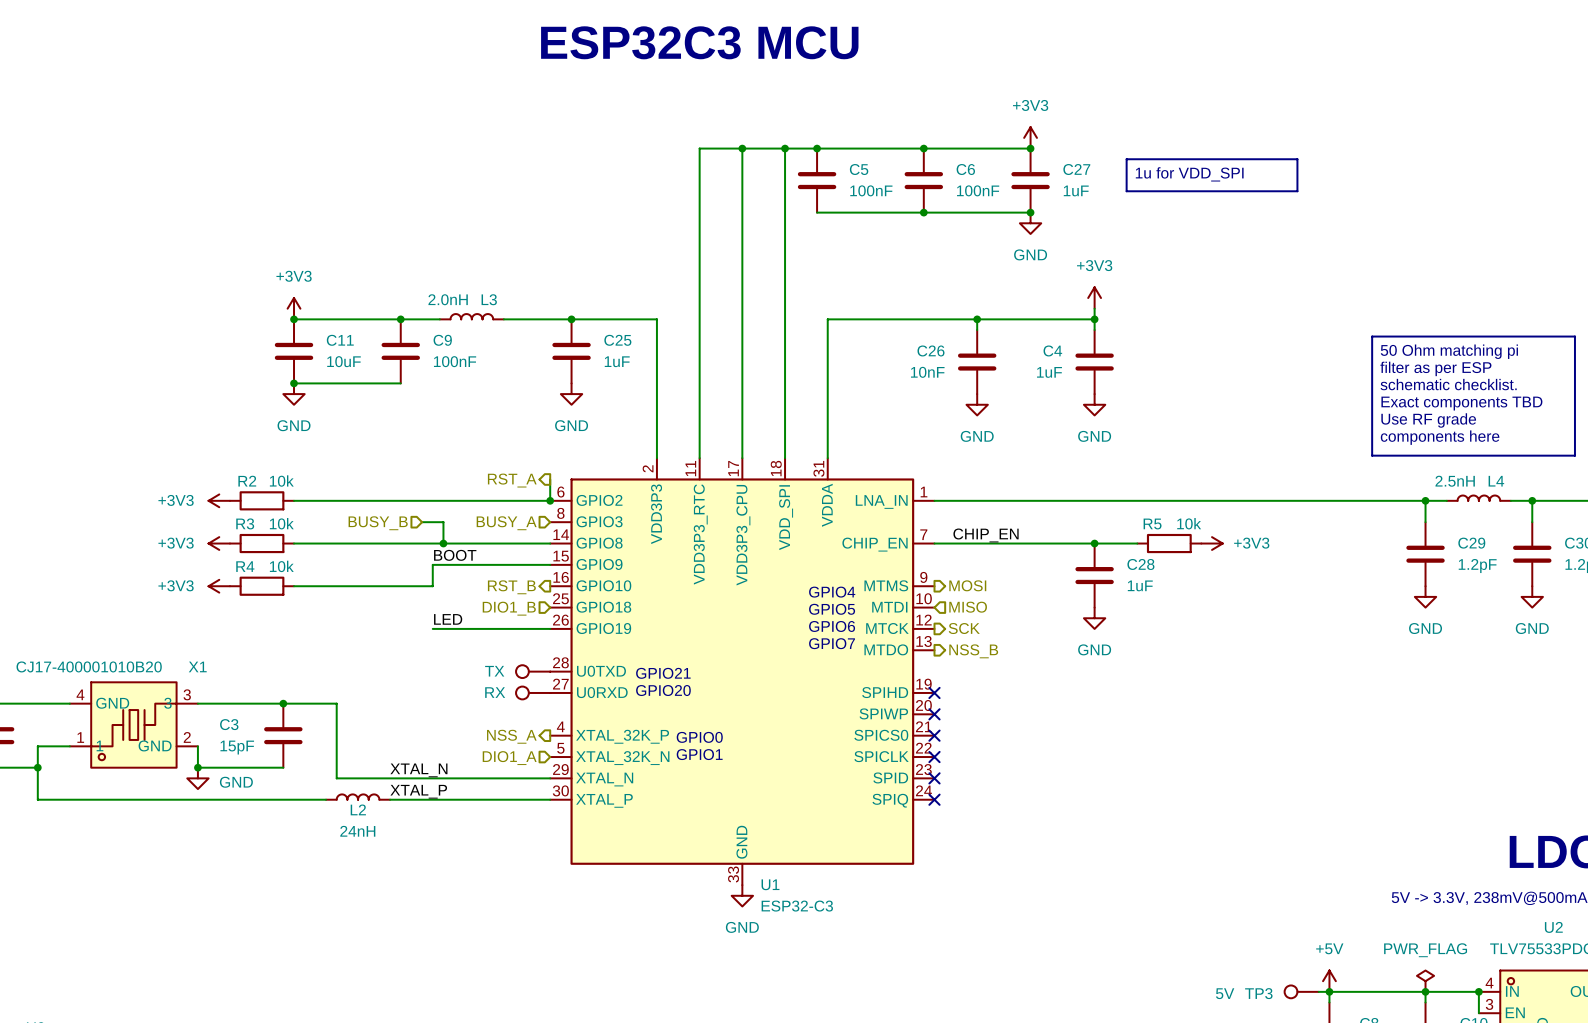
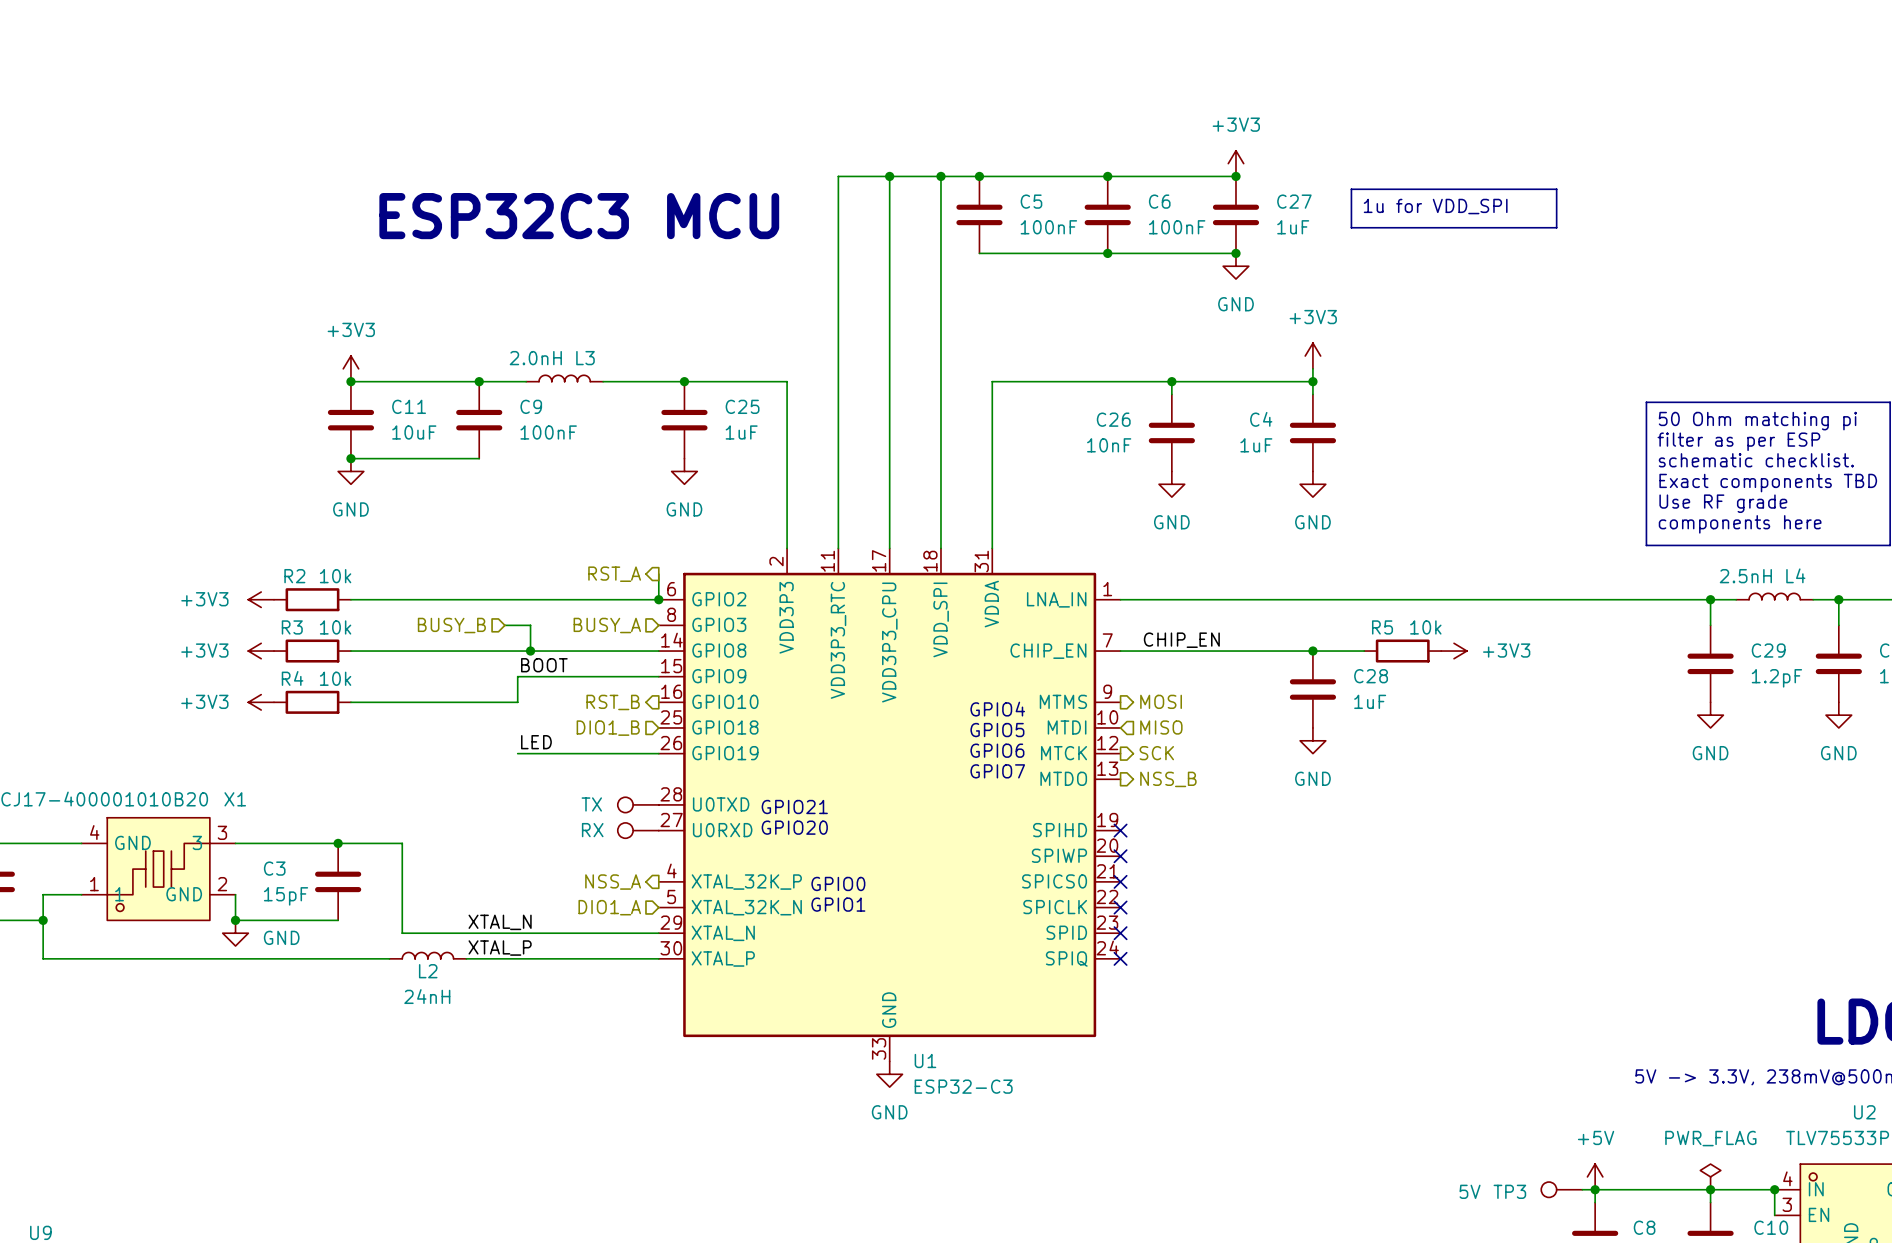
text: ESP32C3 MCU (699, 42) -> none
text: none -> ESP32C3 MCU (579, 216)

